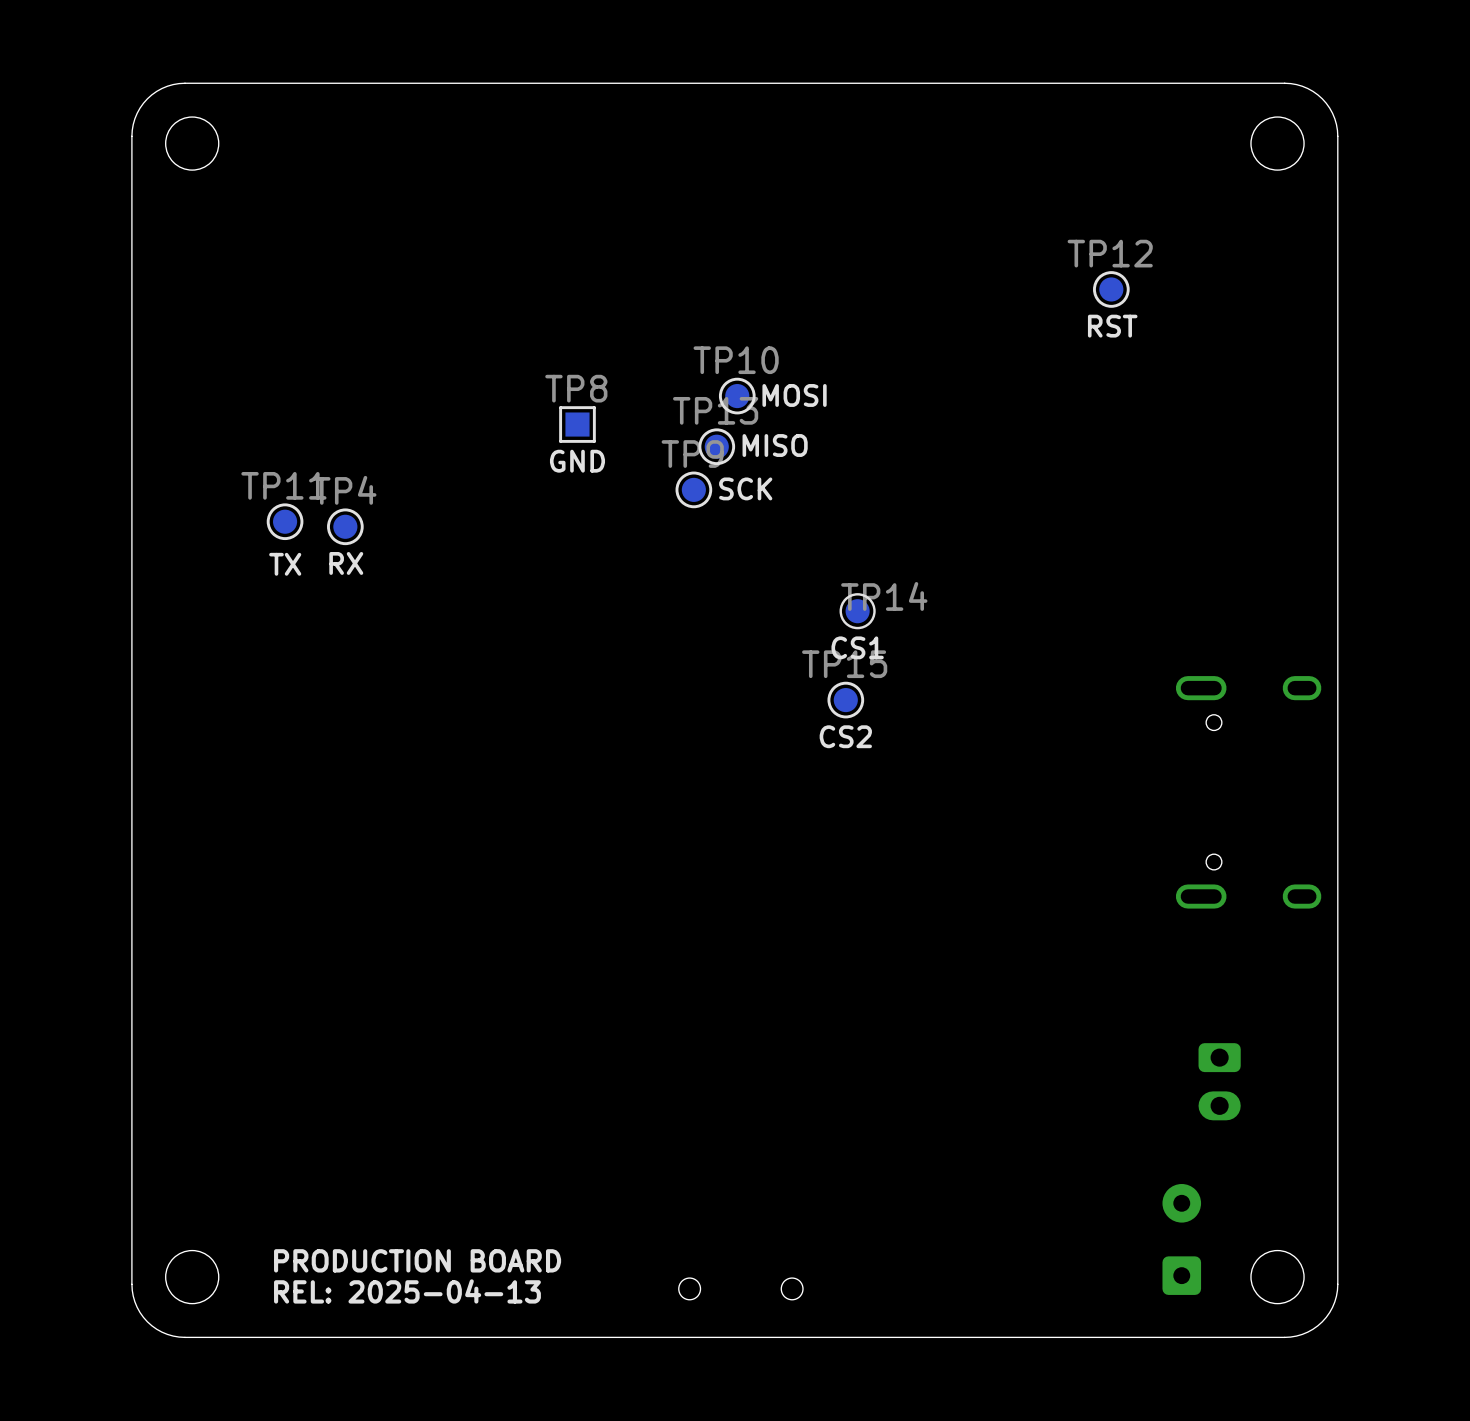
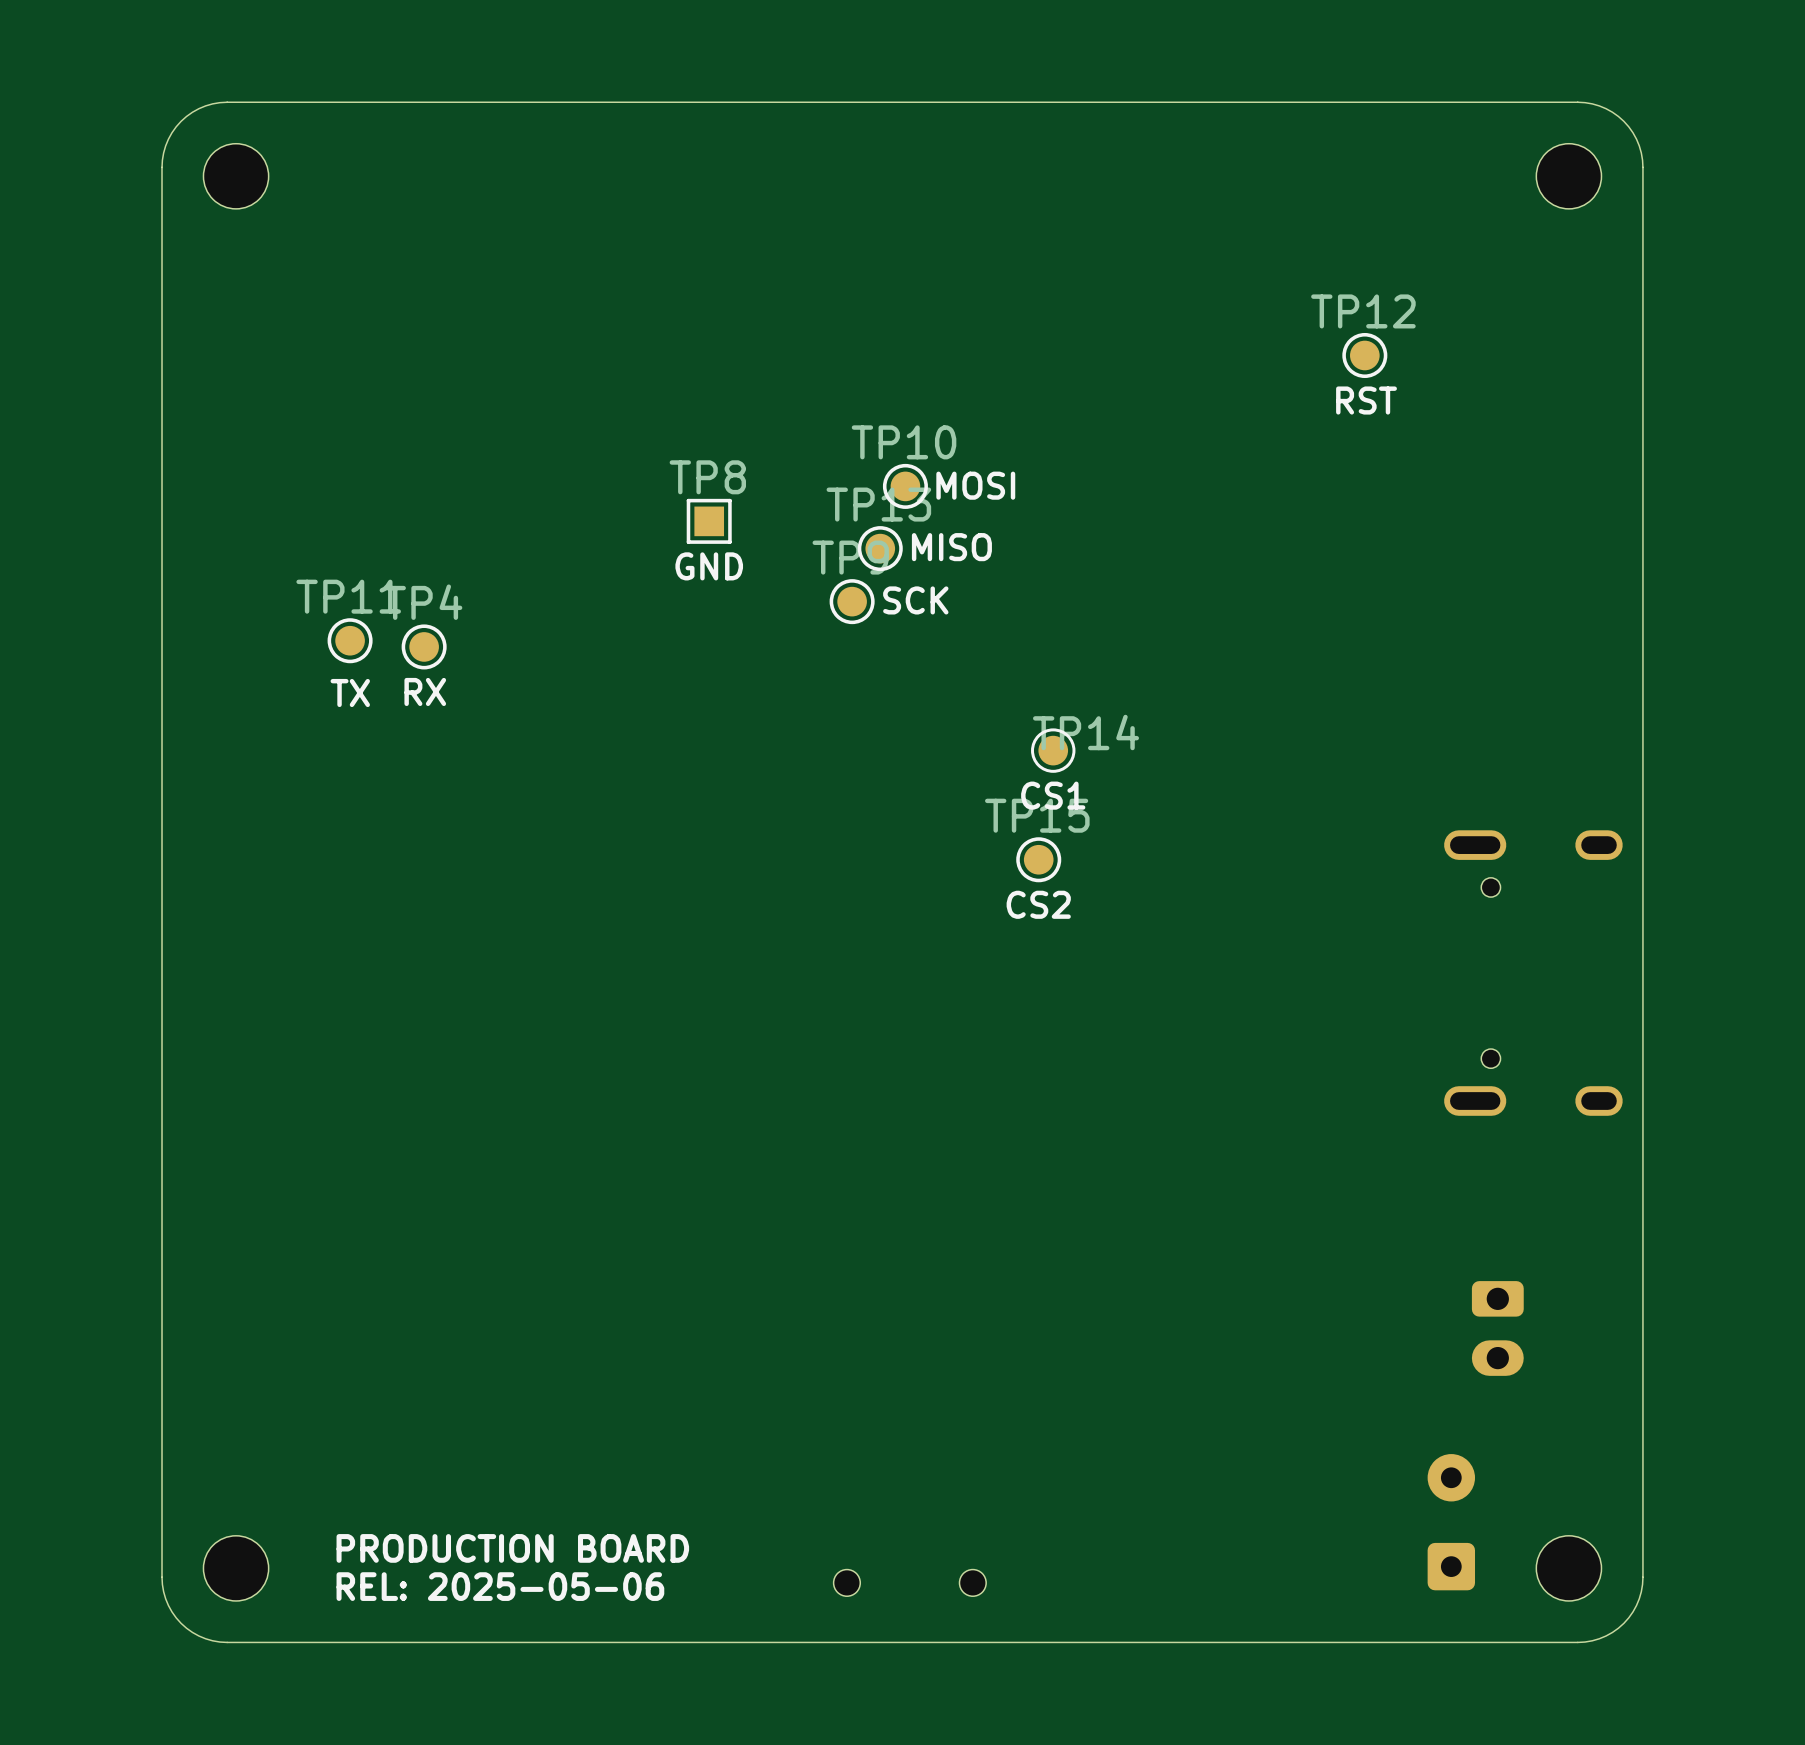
text: REL: 2025-04-13 (407, 1291) -> REL: 2025-05-06 (500, 1586)

